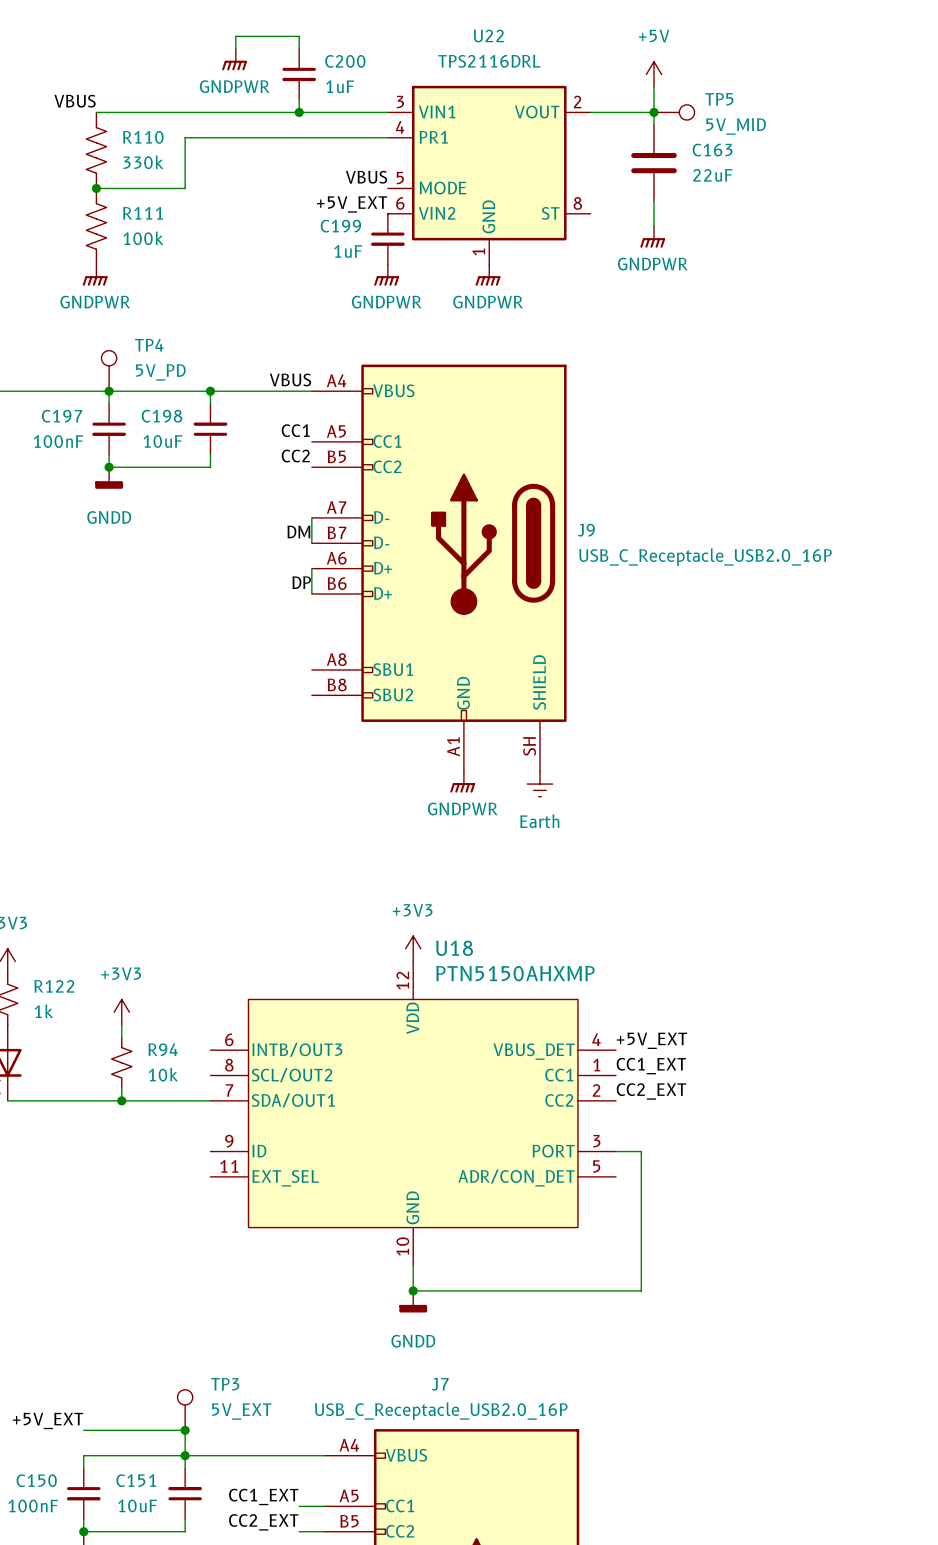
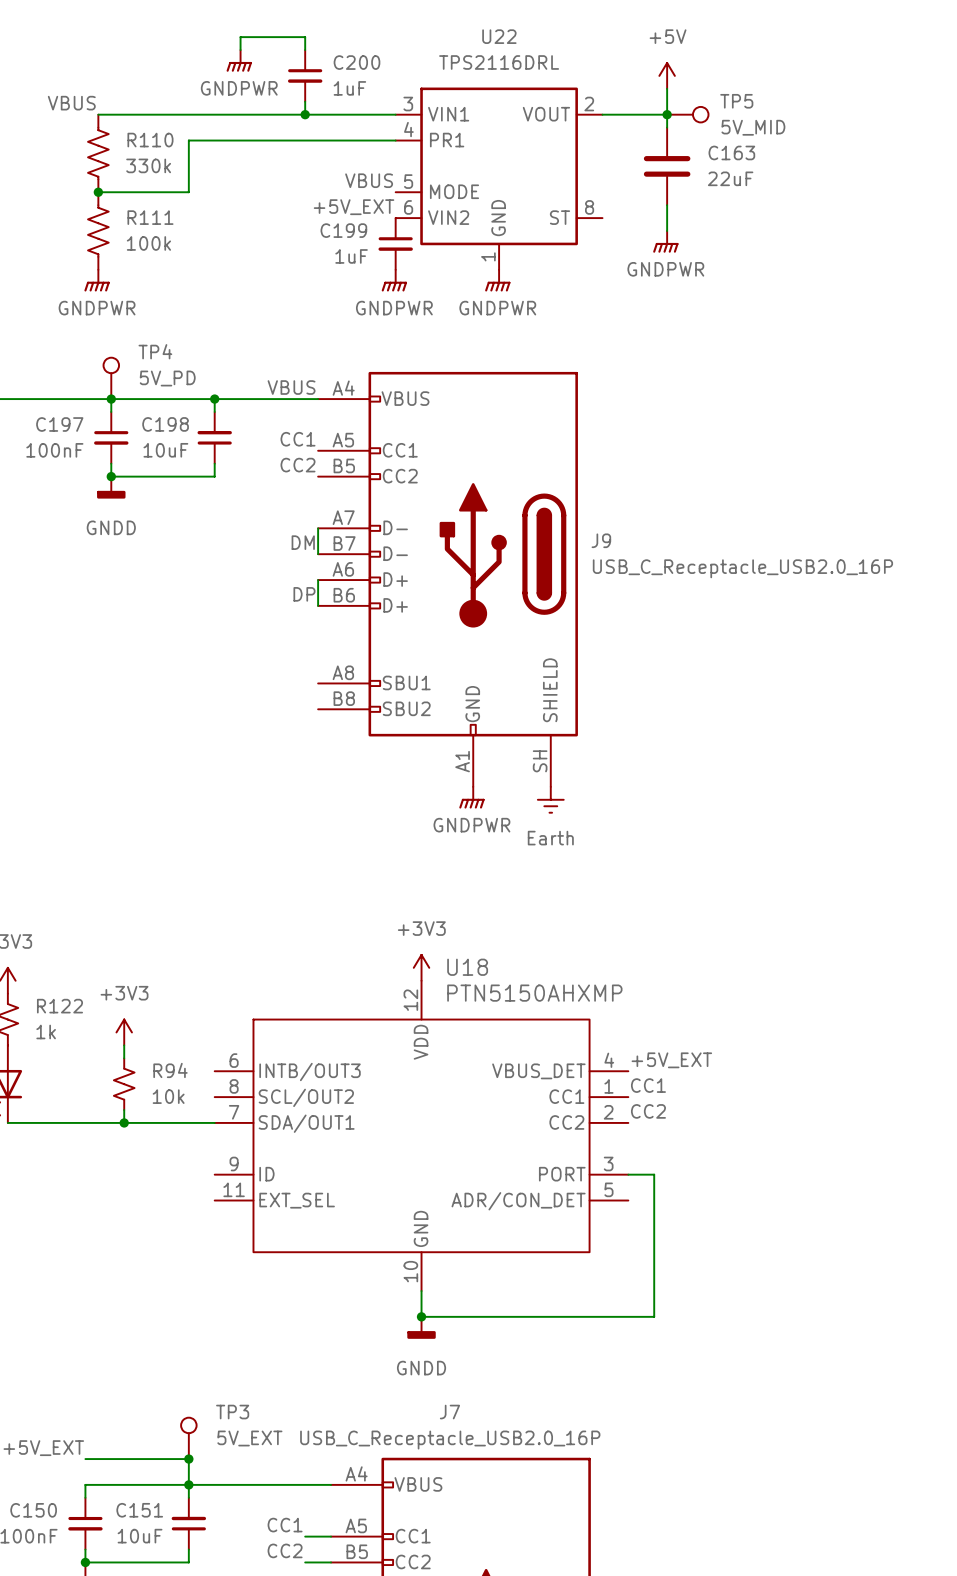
label: CC1_EXT (651, 1066) -> CC1 (648, 1085)
label: CC2_EXT (651, 1091) -> CC2 (648, 1111)
label: CC1_EXT (263, 1496) -> CC1 (285, 1525)
label: CC2_EXT (263, 1522) -> CC2 (285, 1550)

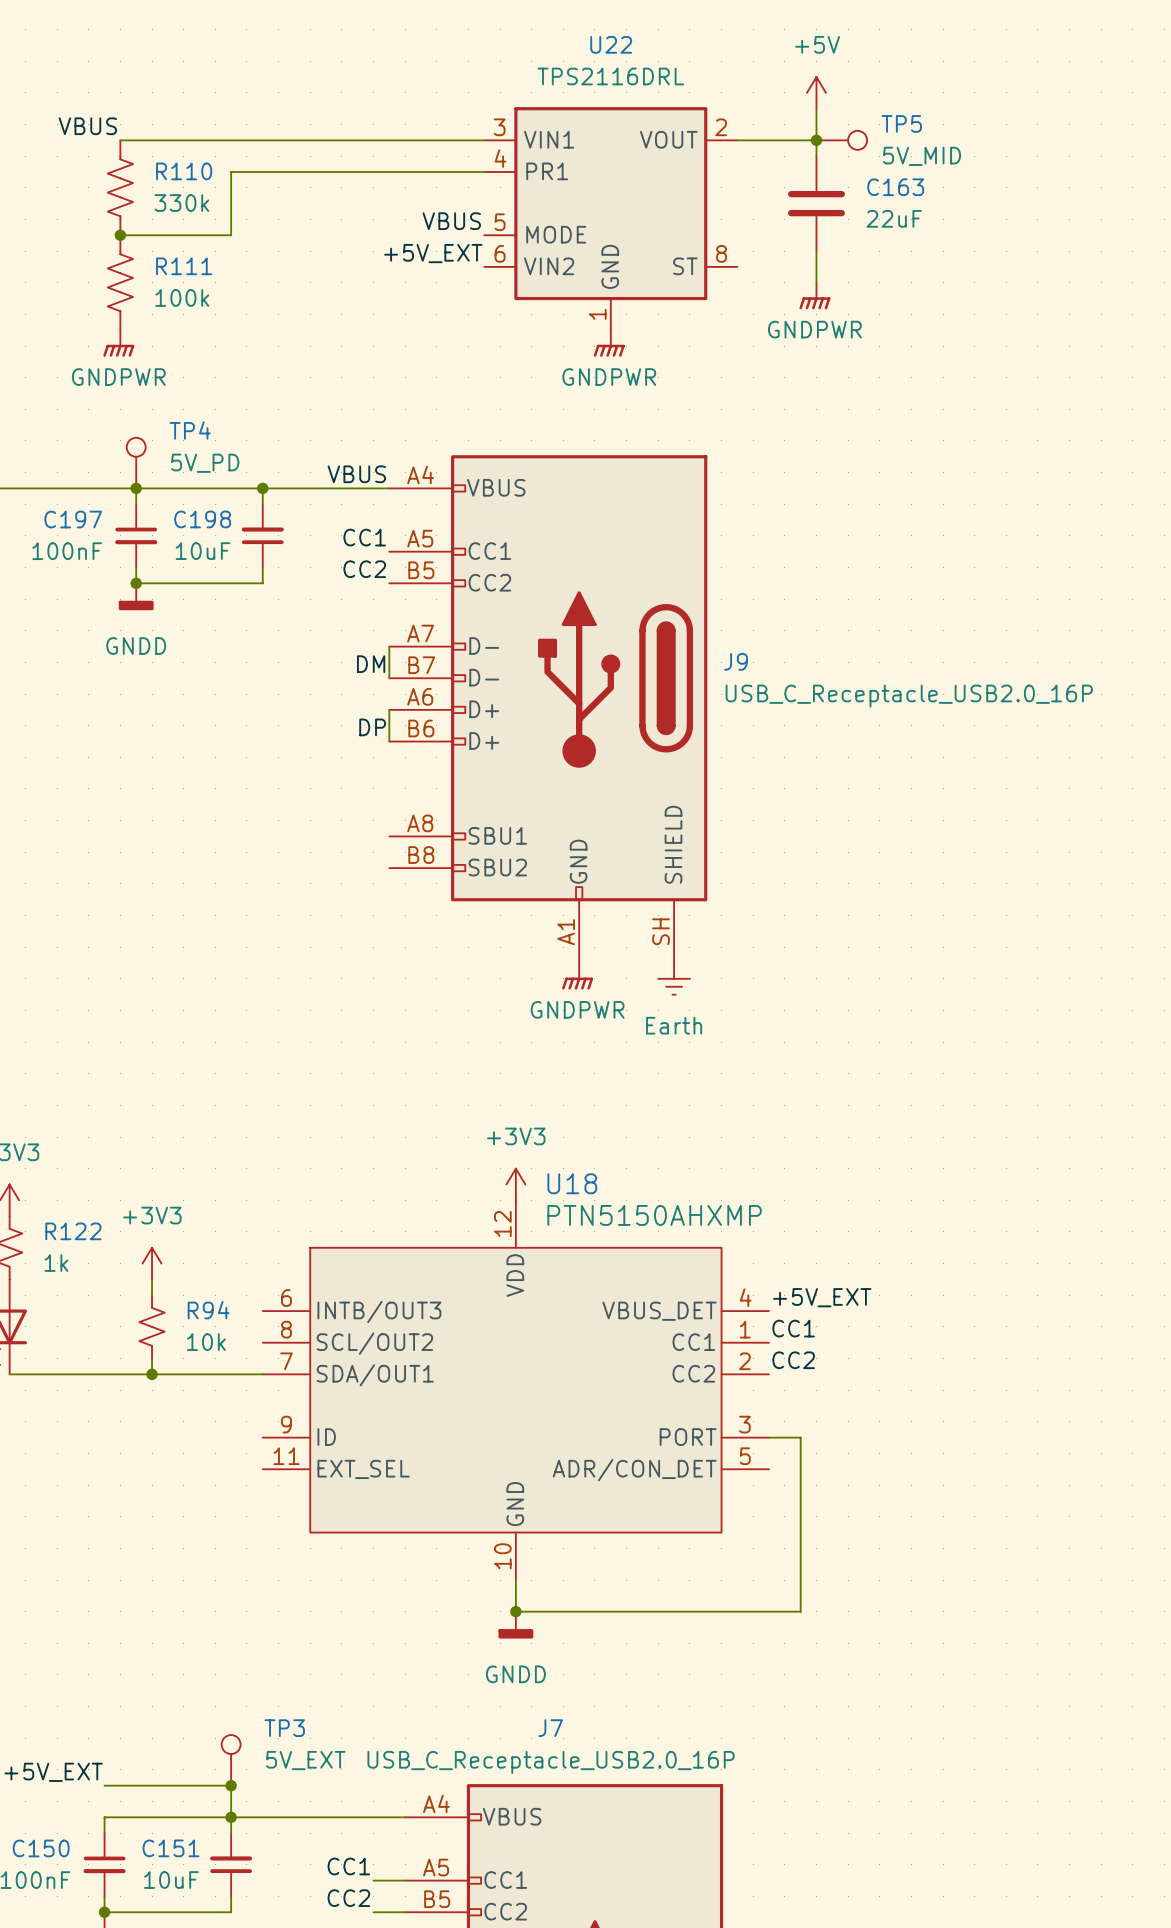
wire: (240, 50) (240, 37) (305, 37) (305, 50) -> none
power symbol: GNDPWR (239, 60) -> none
C200: 1uF (305, 75) -> none
wire: (305, 101) (305, 114) -> none
junction: (305, 114) -> none
C199: 1uF (395, 243) -> none
power symbol: GNDPWR (394, 280) -> none

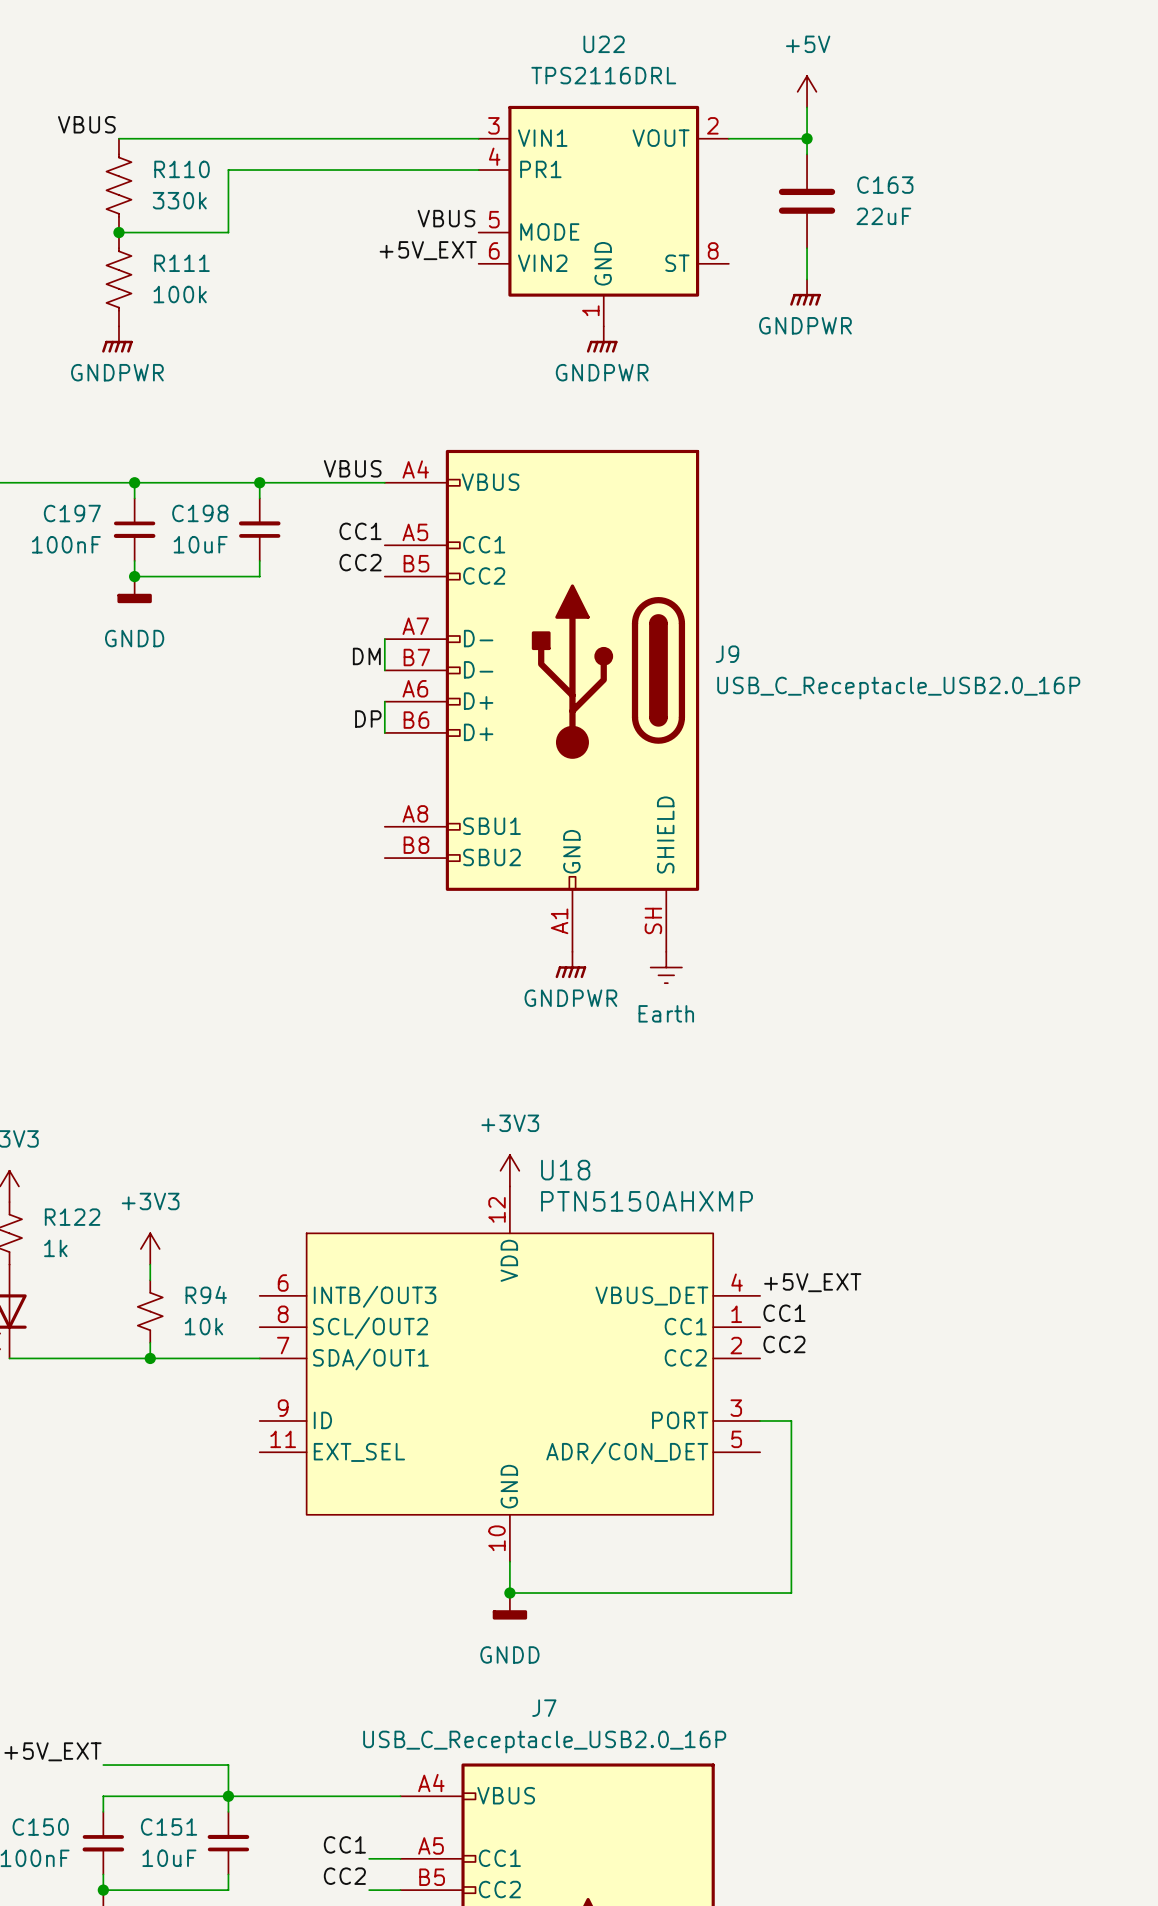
TP5: 5V_MID (841, 140) -> none
TP4: 5V_PD (136, 463) -> none
TP3: 5V_EXT (231, 1760) -> none
junction: (231, 1785) -> none

